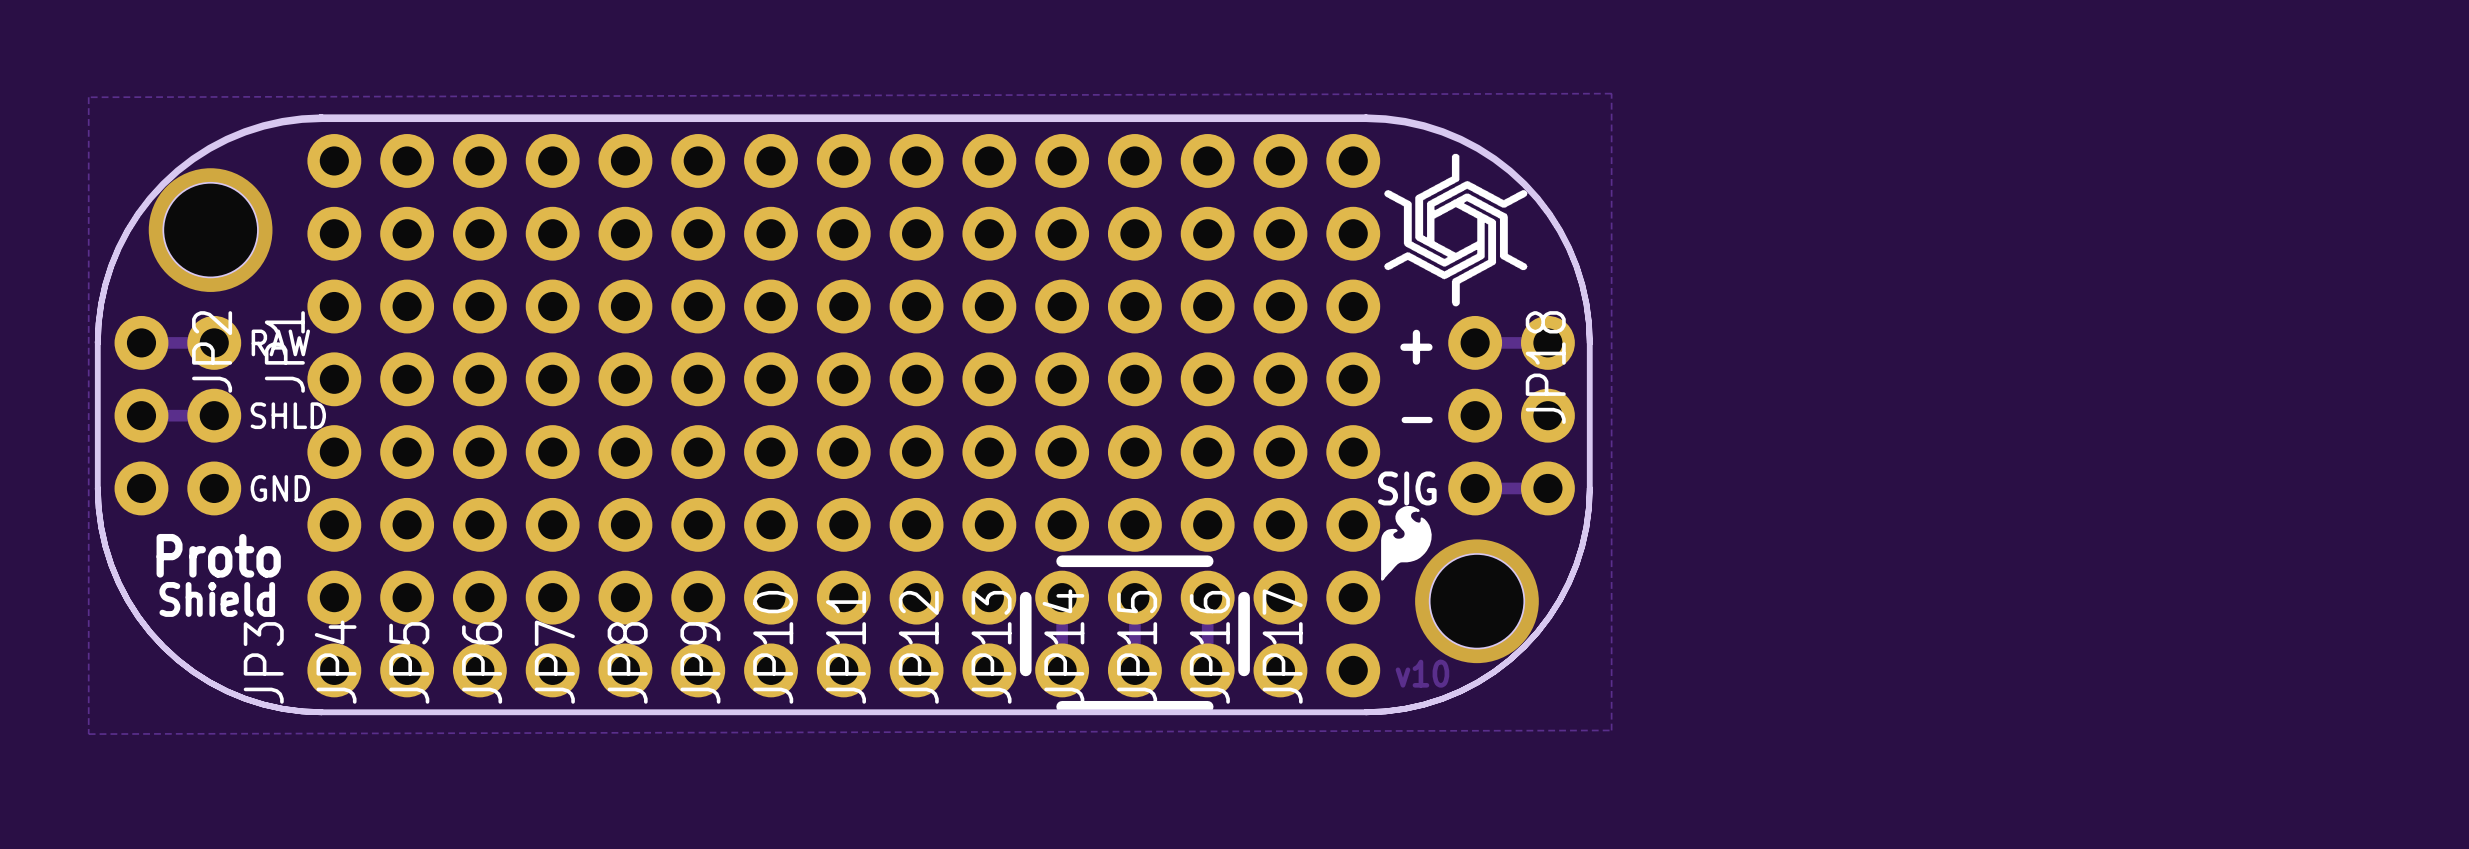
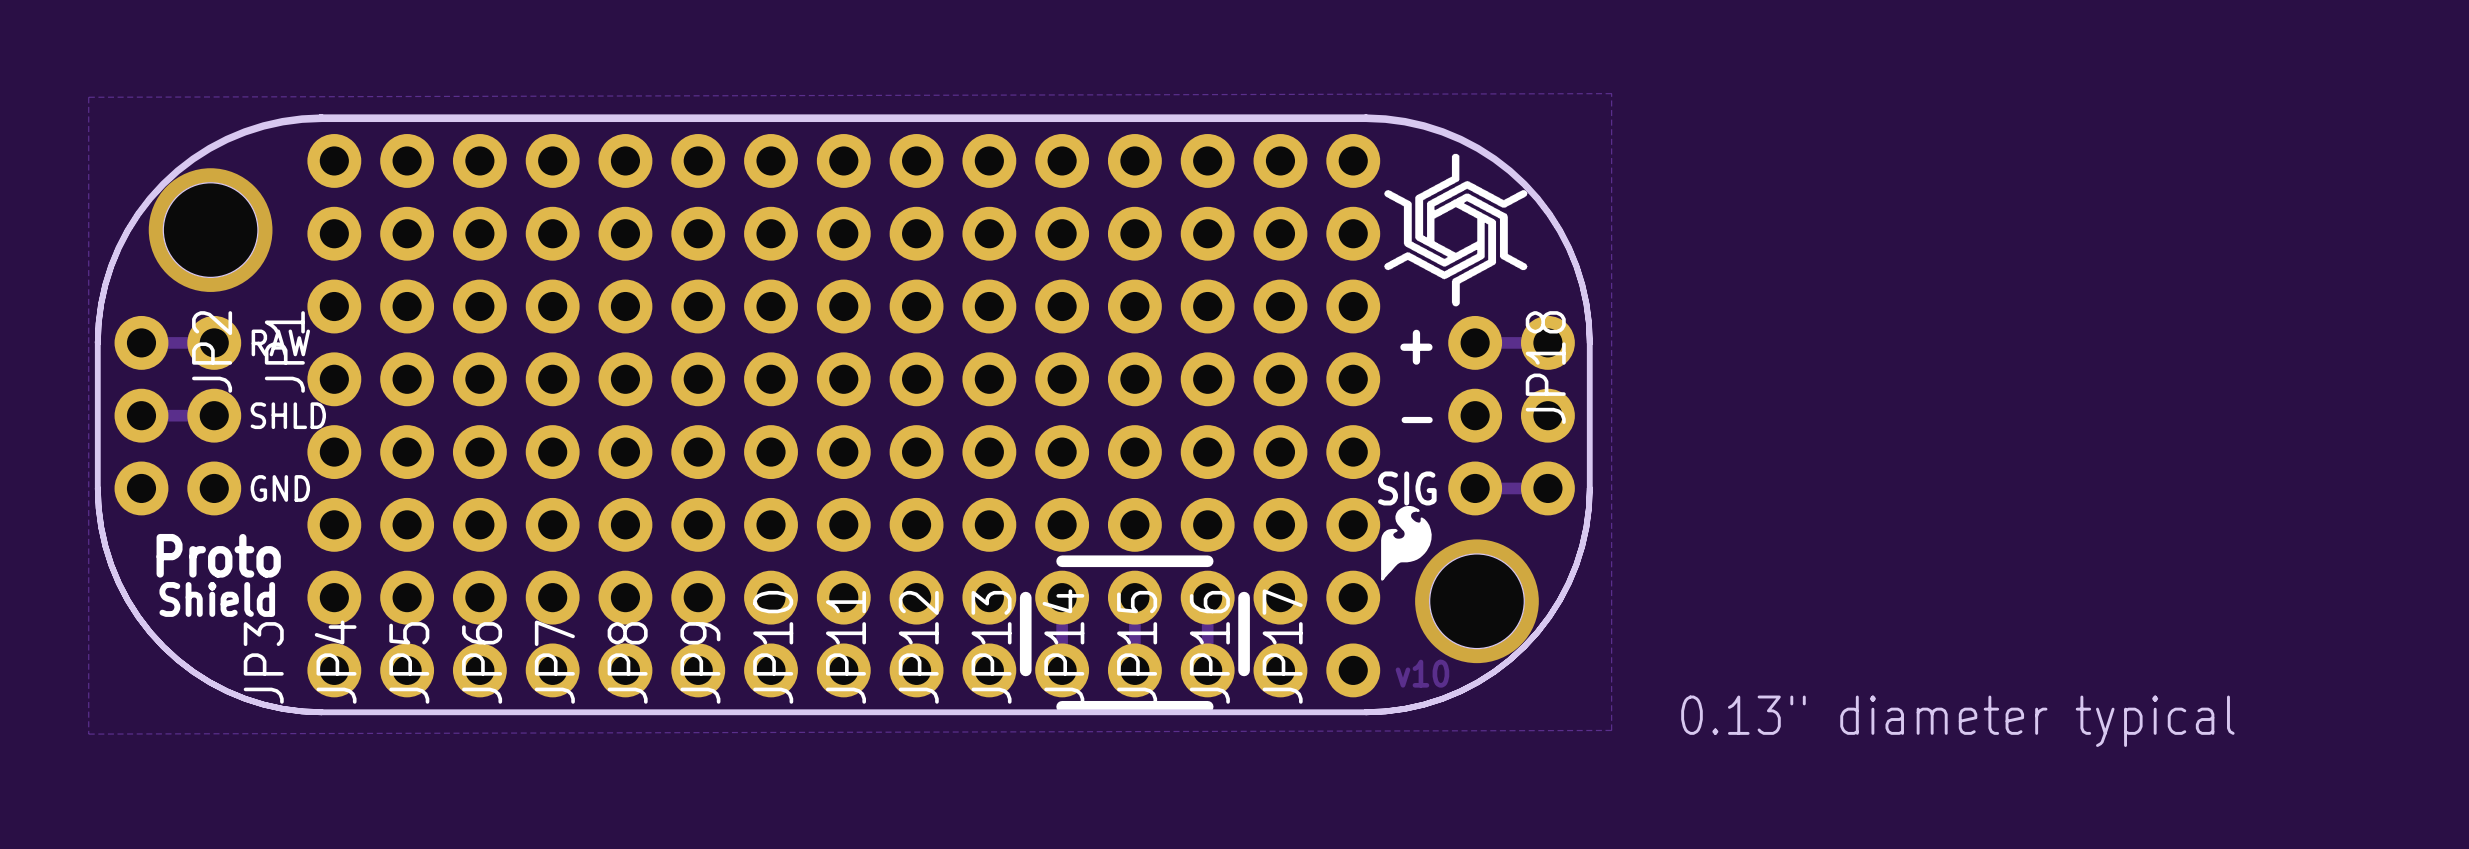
text: none -> 0.13" diameter typical (1957, 721)

